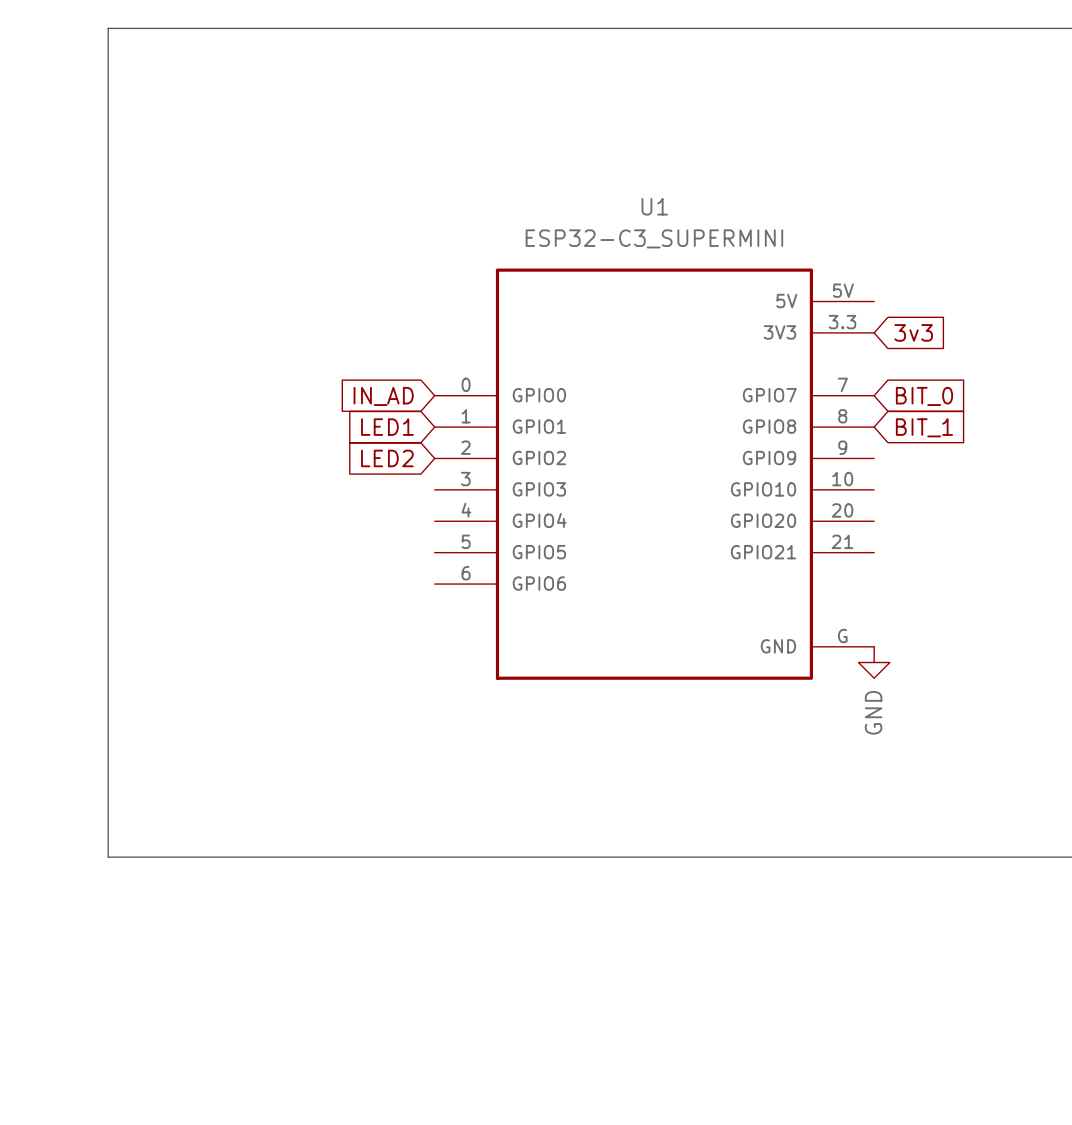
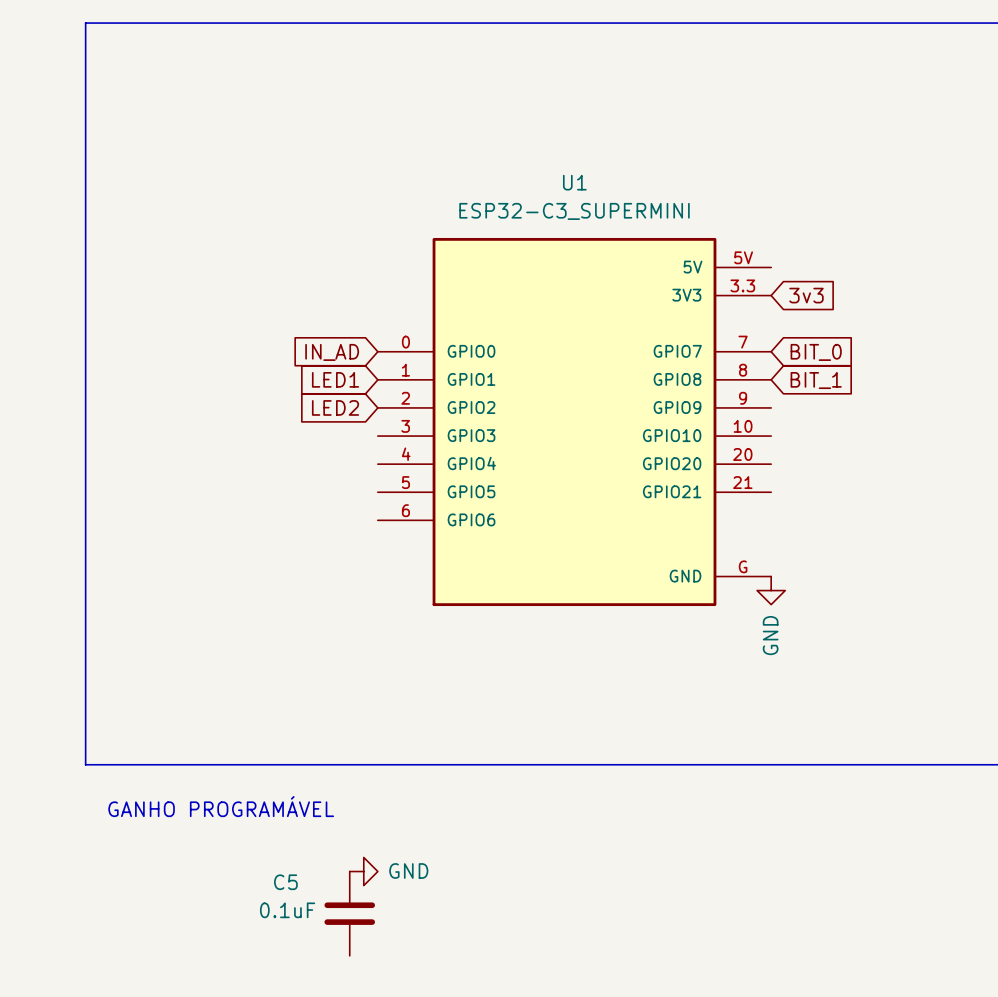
text: none -> GANHO PROGRAMÁVEL (221, 806)
power symbol: none -> GND (363, 871)
C5: none -> 0.1uF (349, 913)

